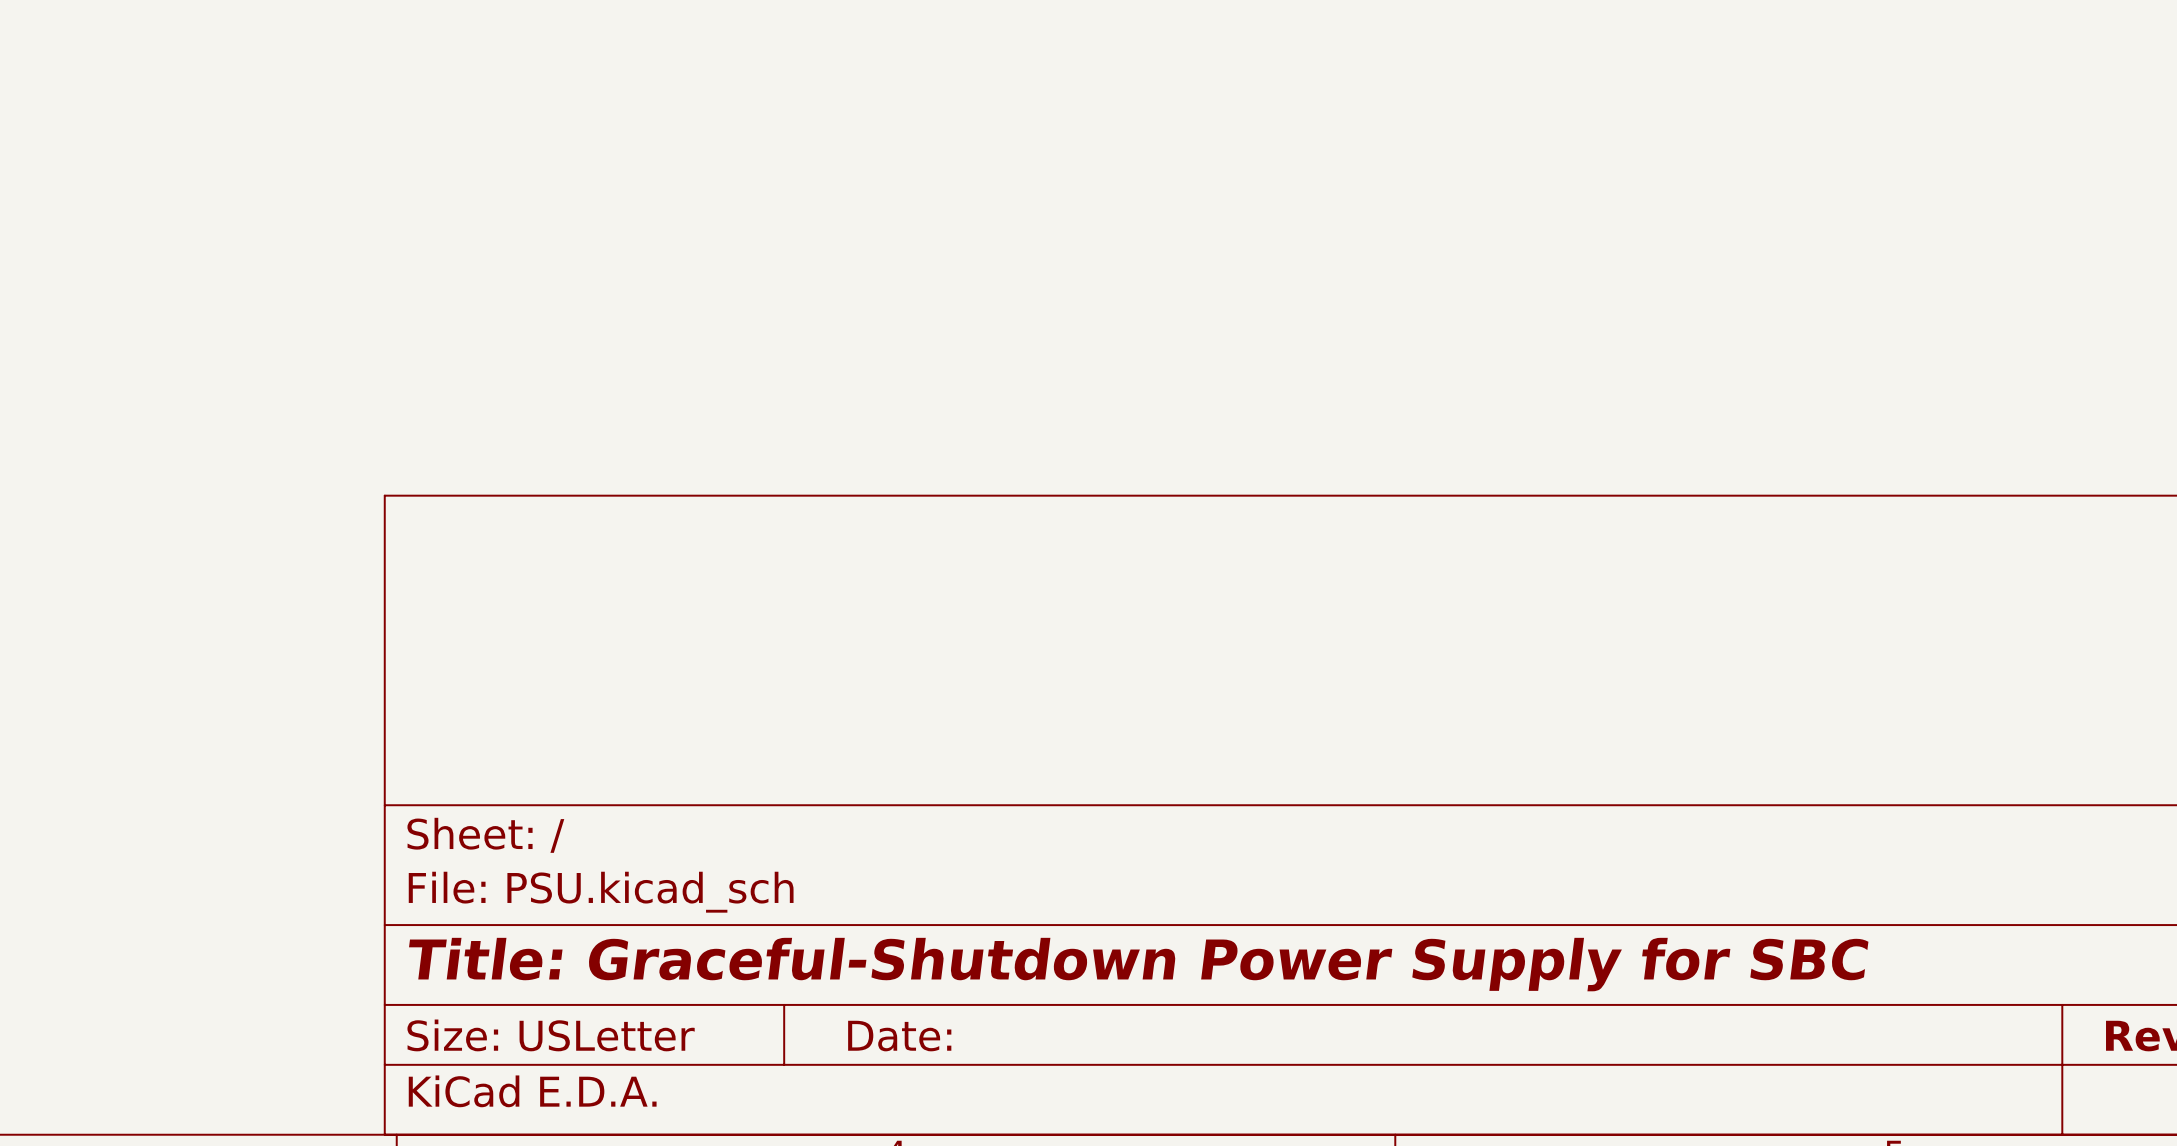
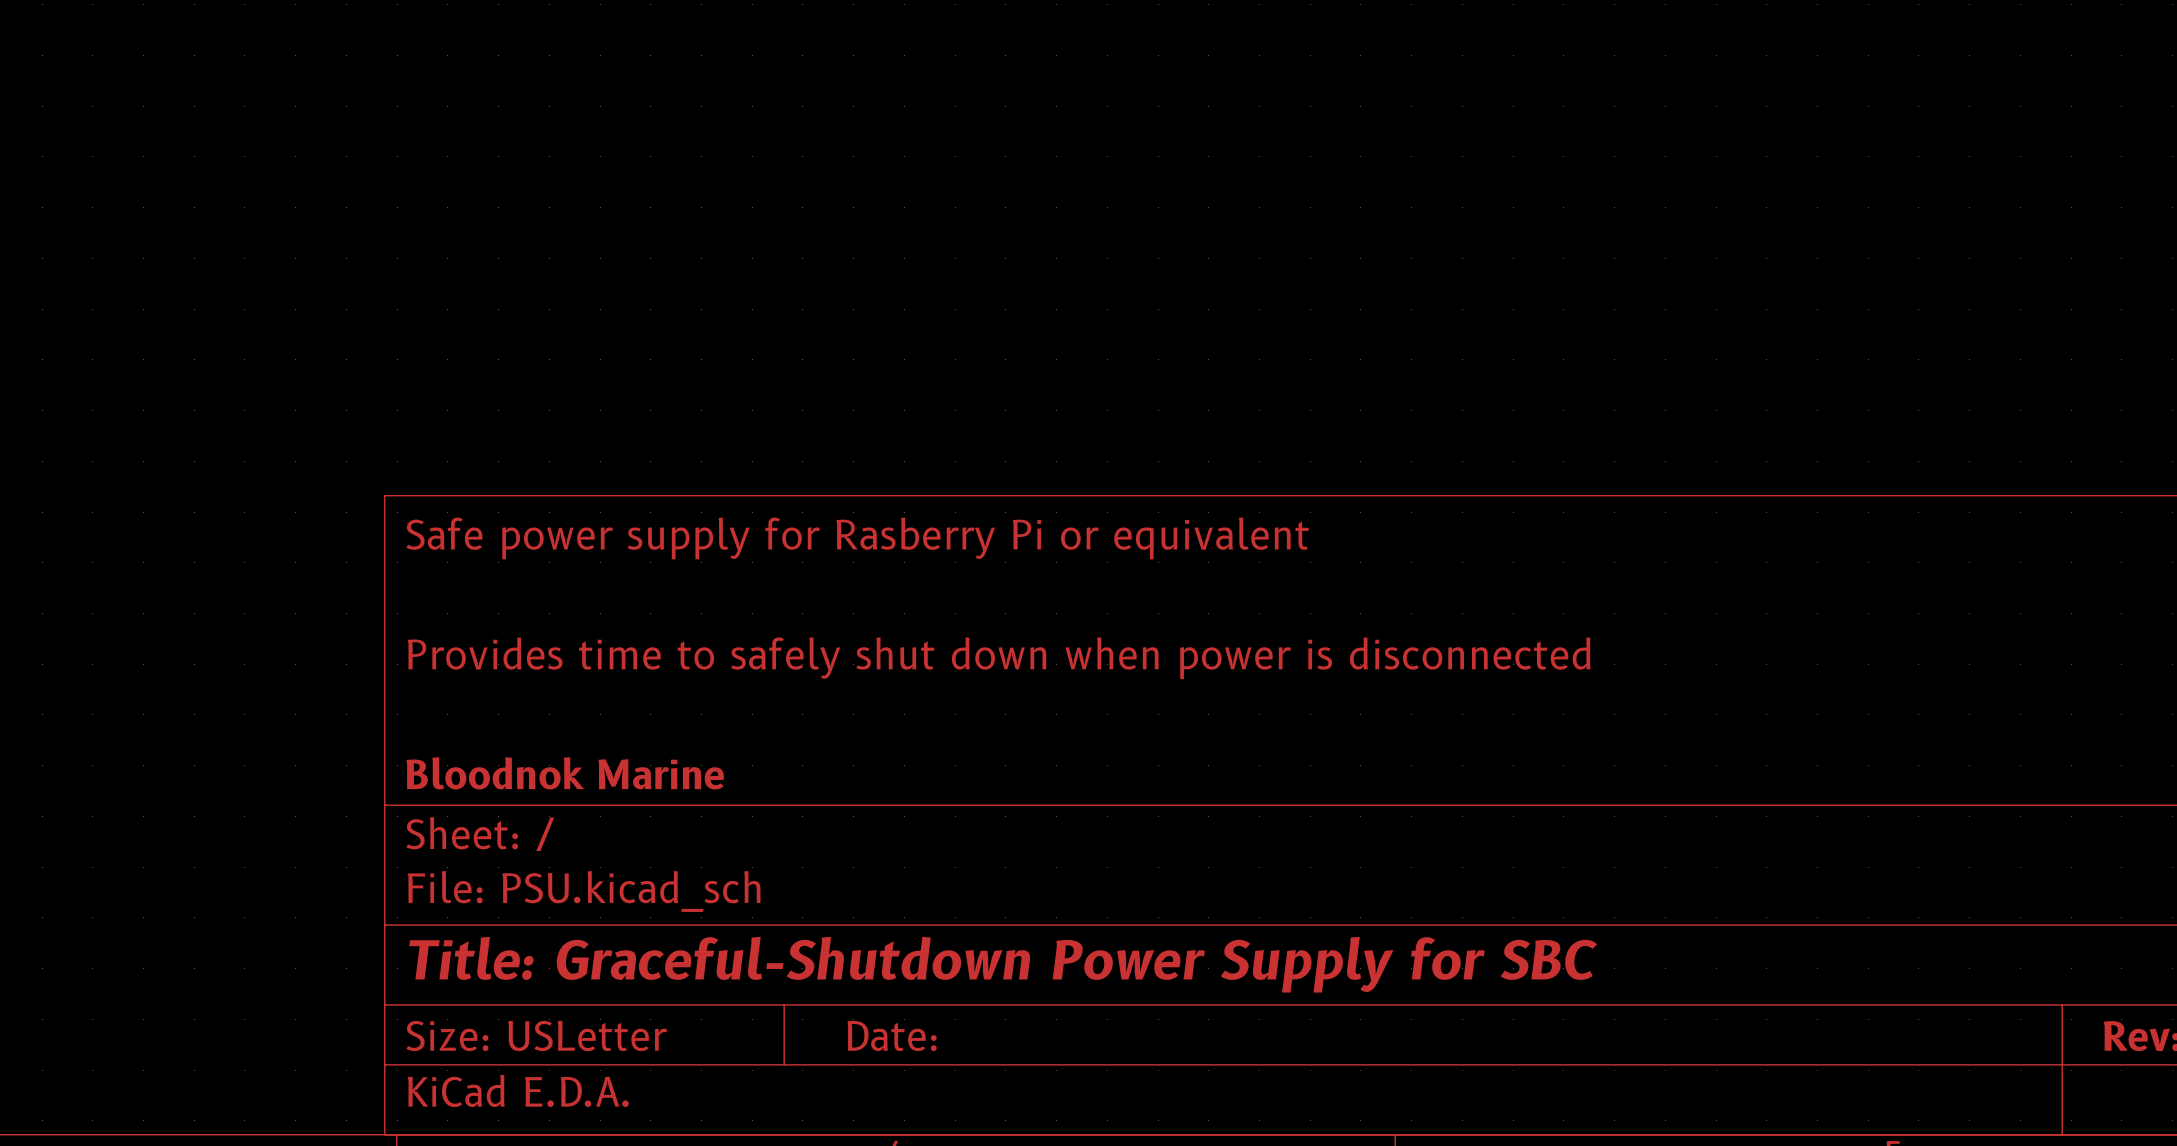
title block: none -> Safe power supply for Rasberry Pi or equivalent (857, 538)
title block: none -> Provides time to safely shut down when power is disconnected (999, 658)
title block: none -> Bloodnok Marine (565, 773)

